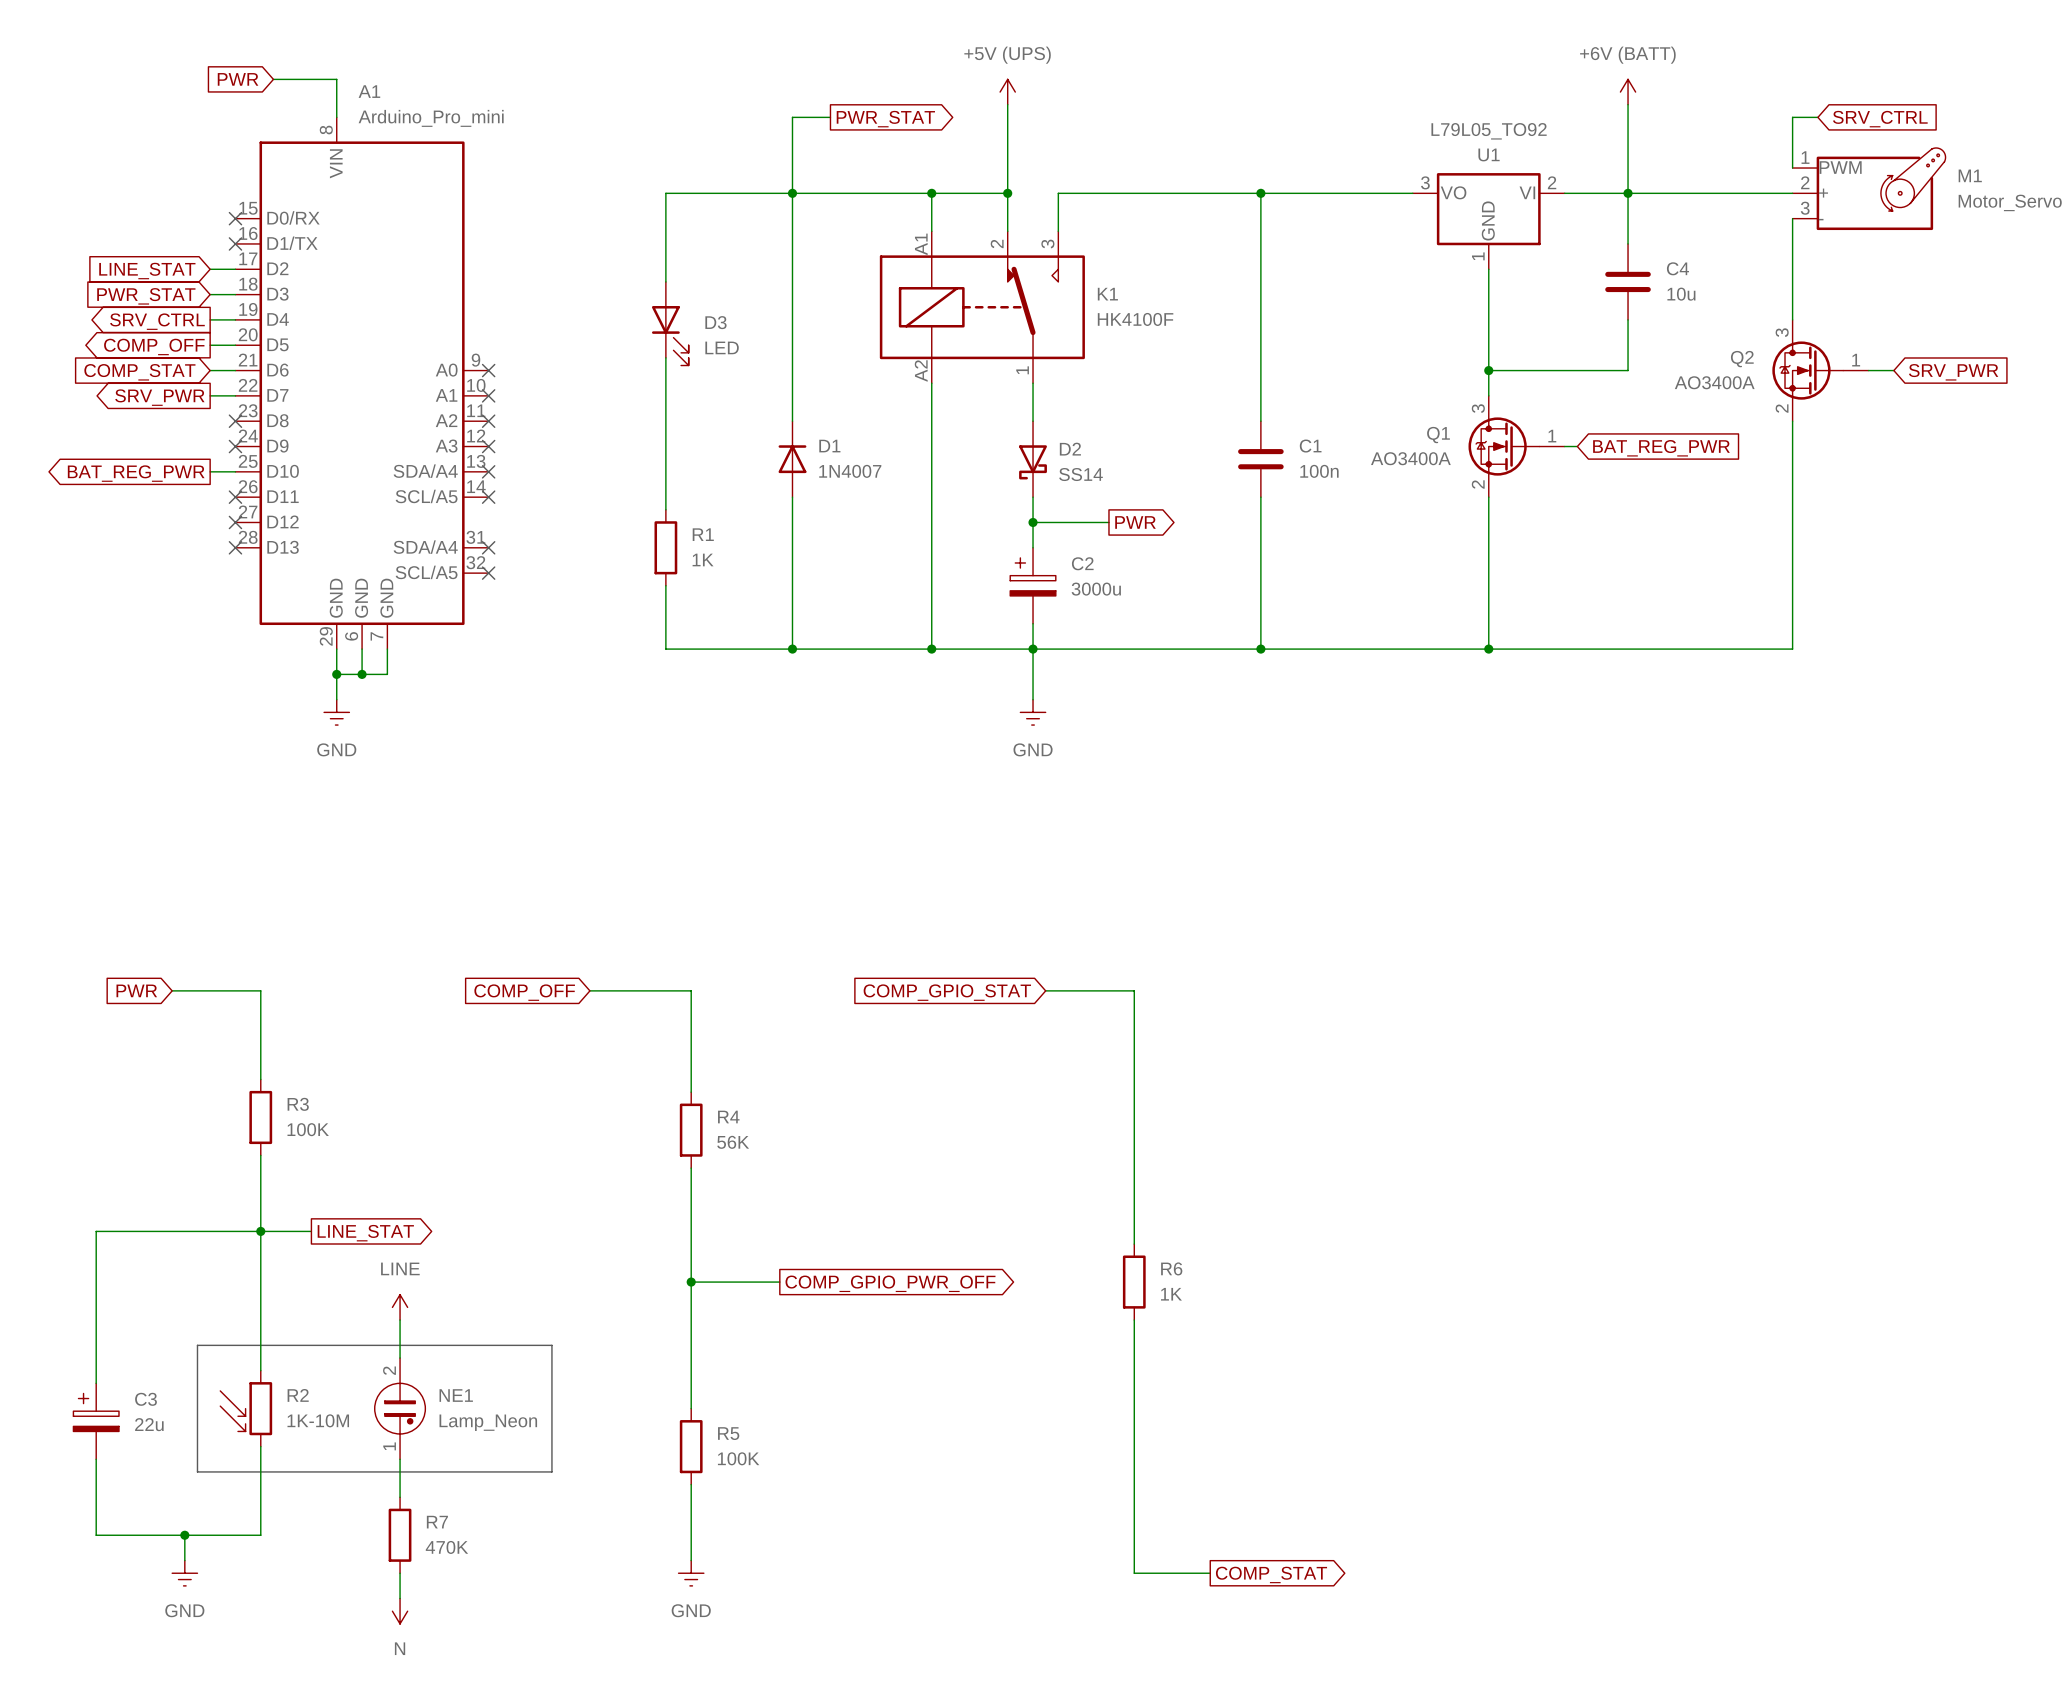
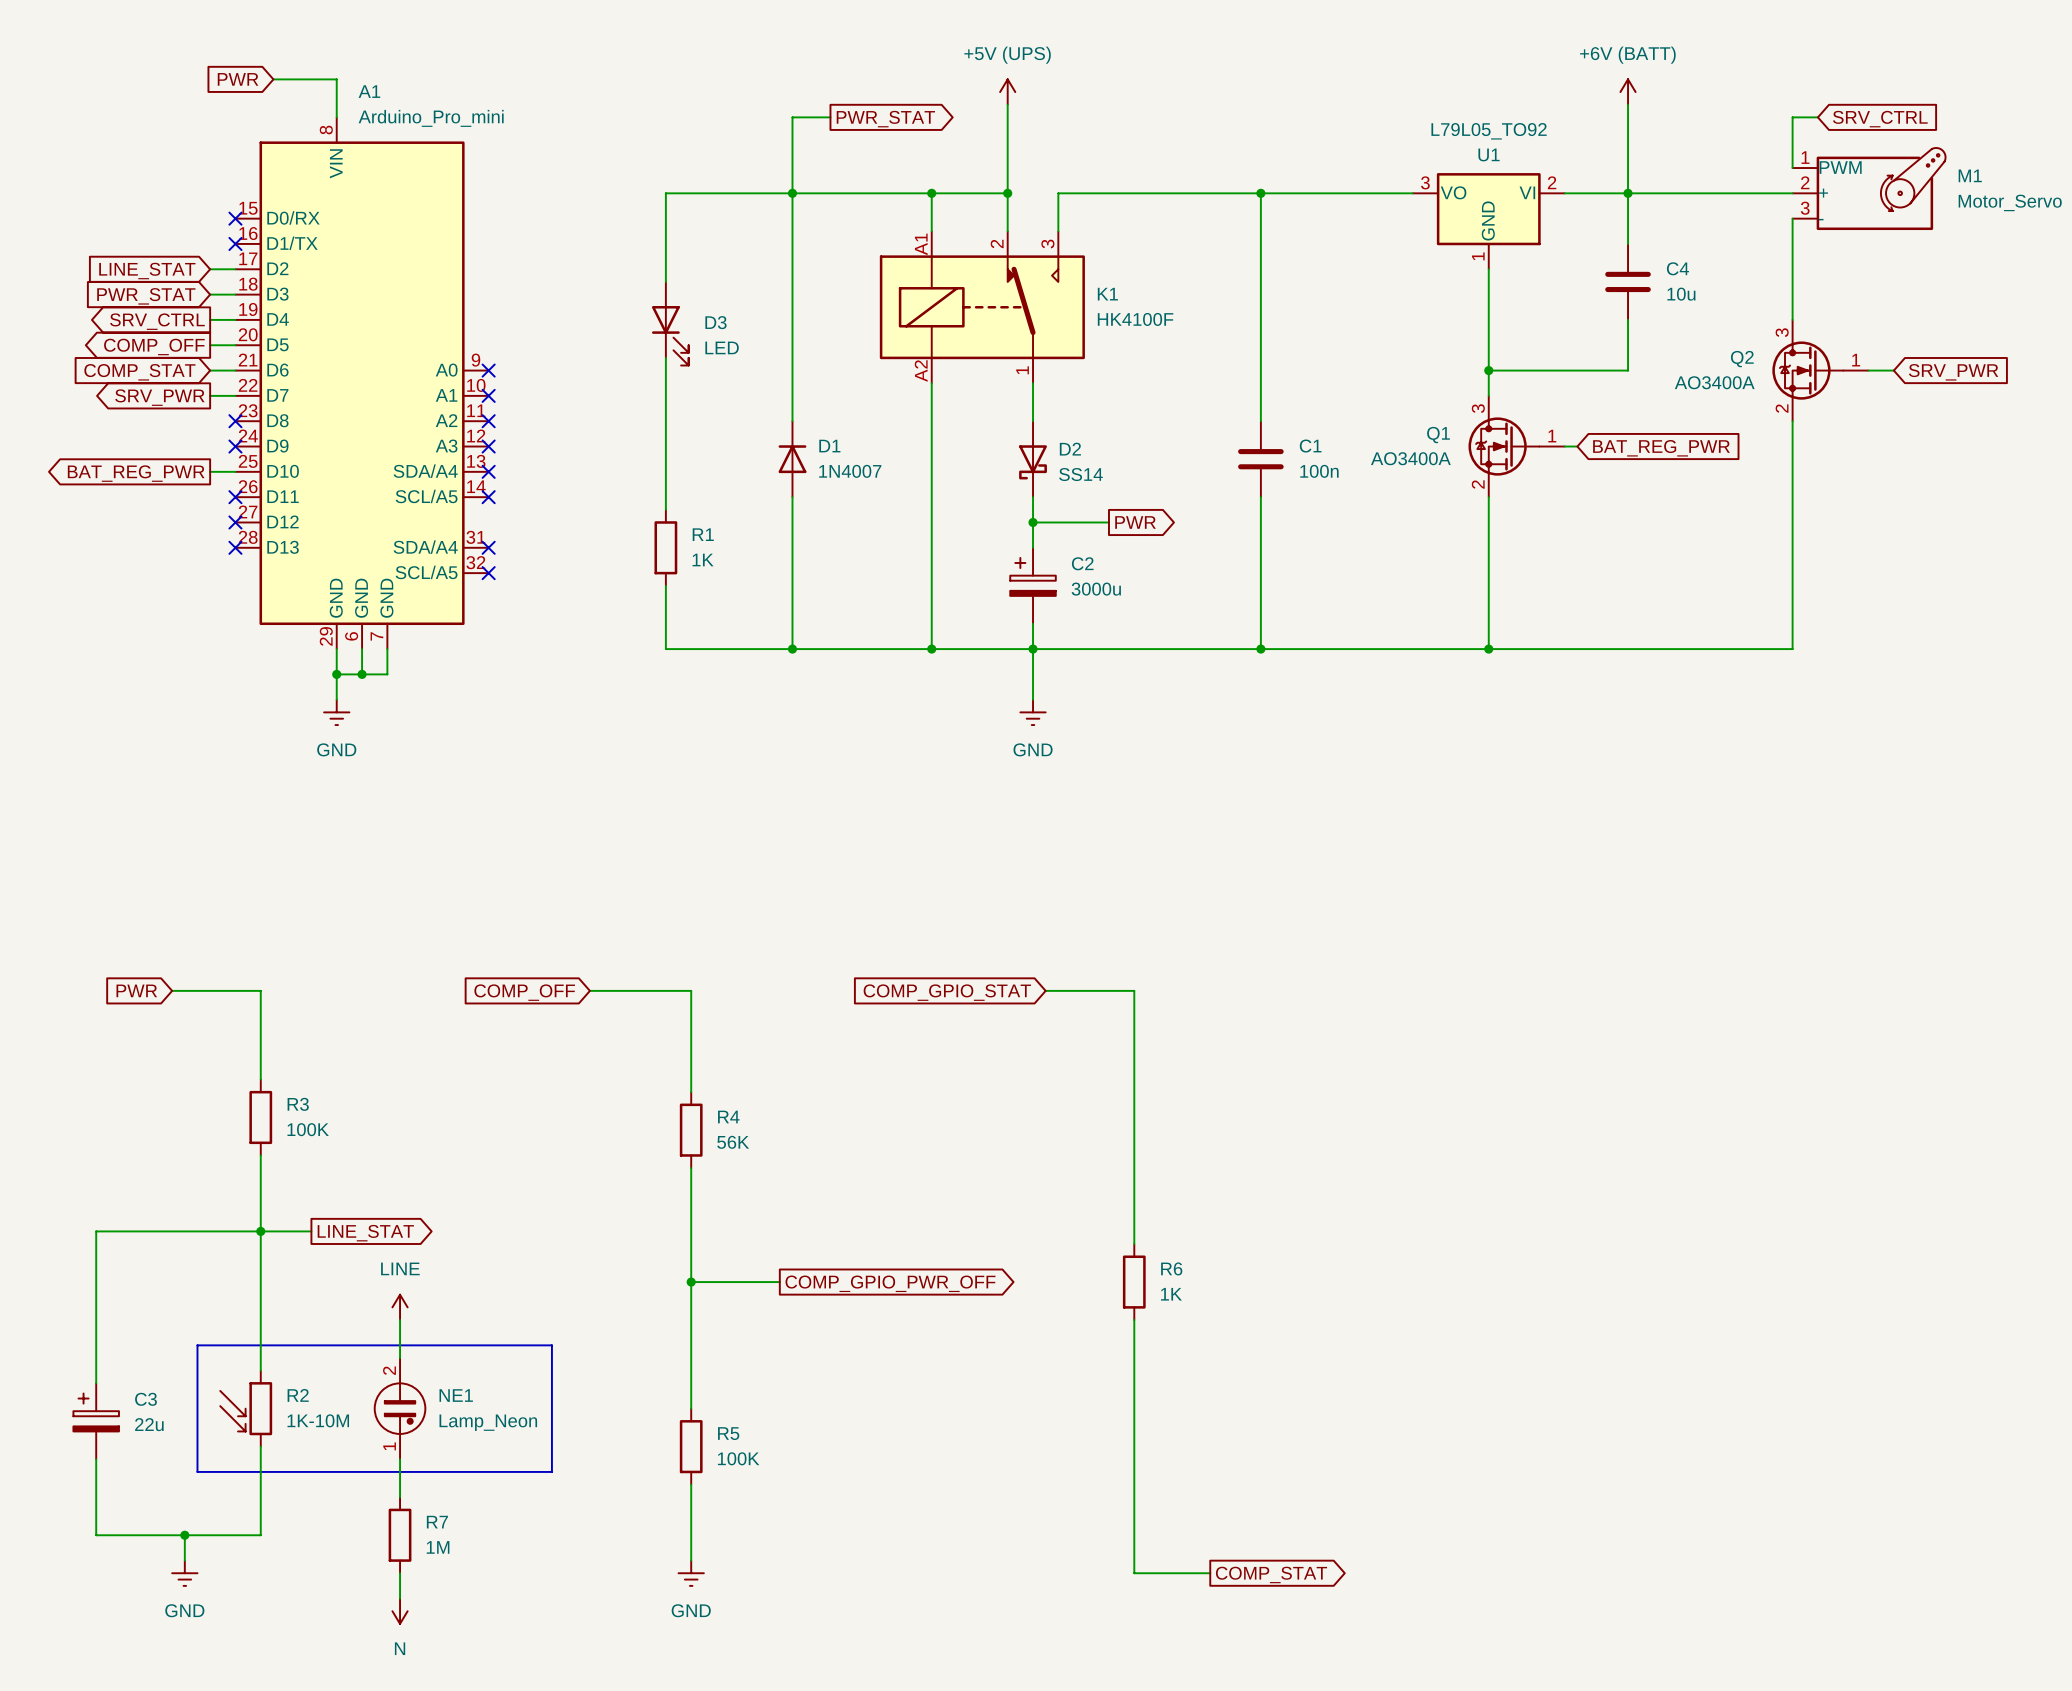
R7 value: 470K (446, 1547) -> 1M (438, 1547)

